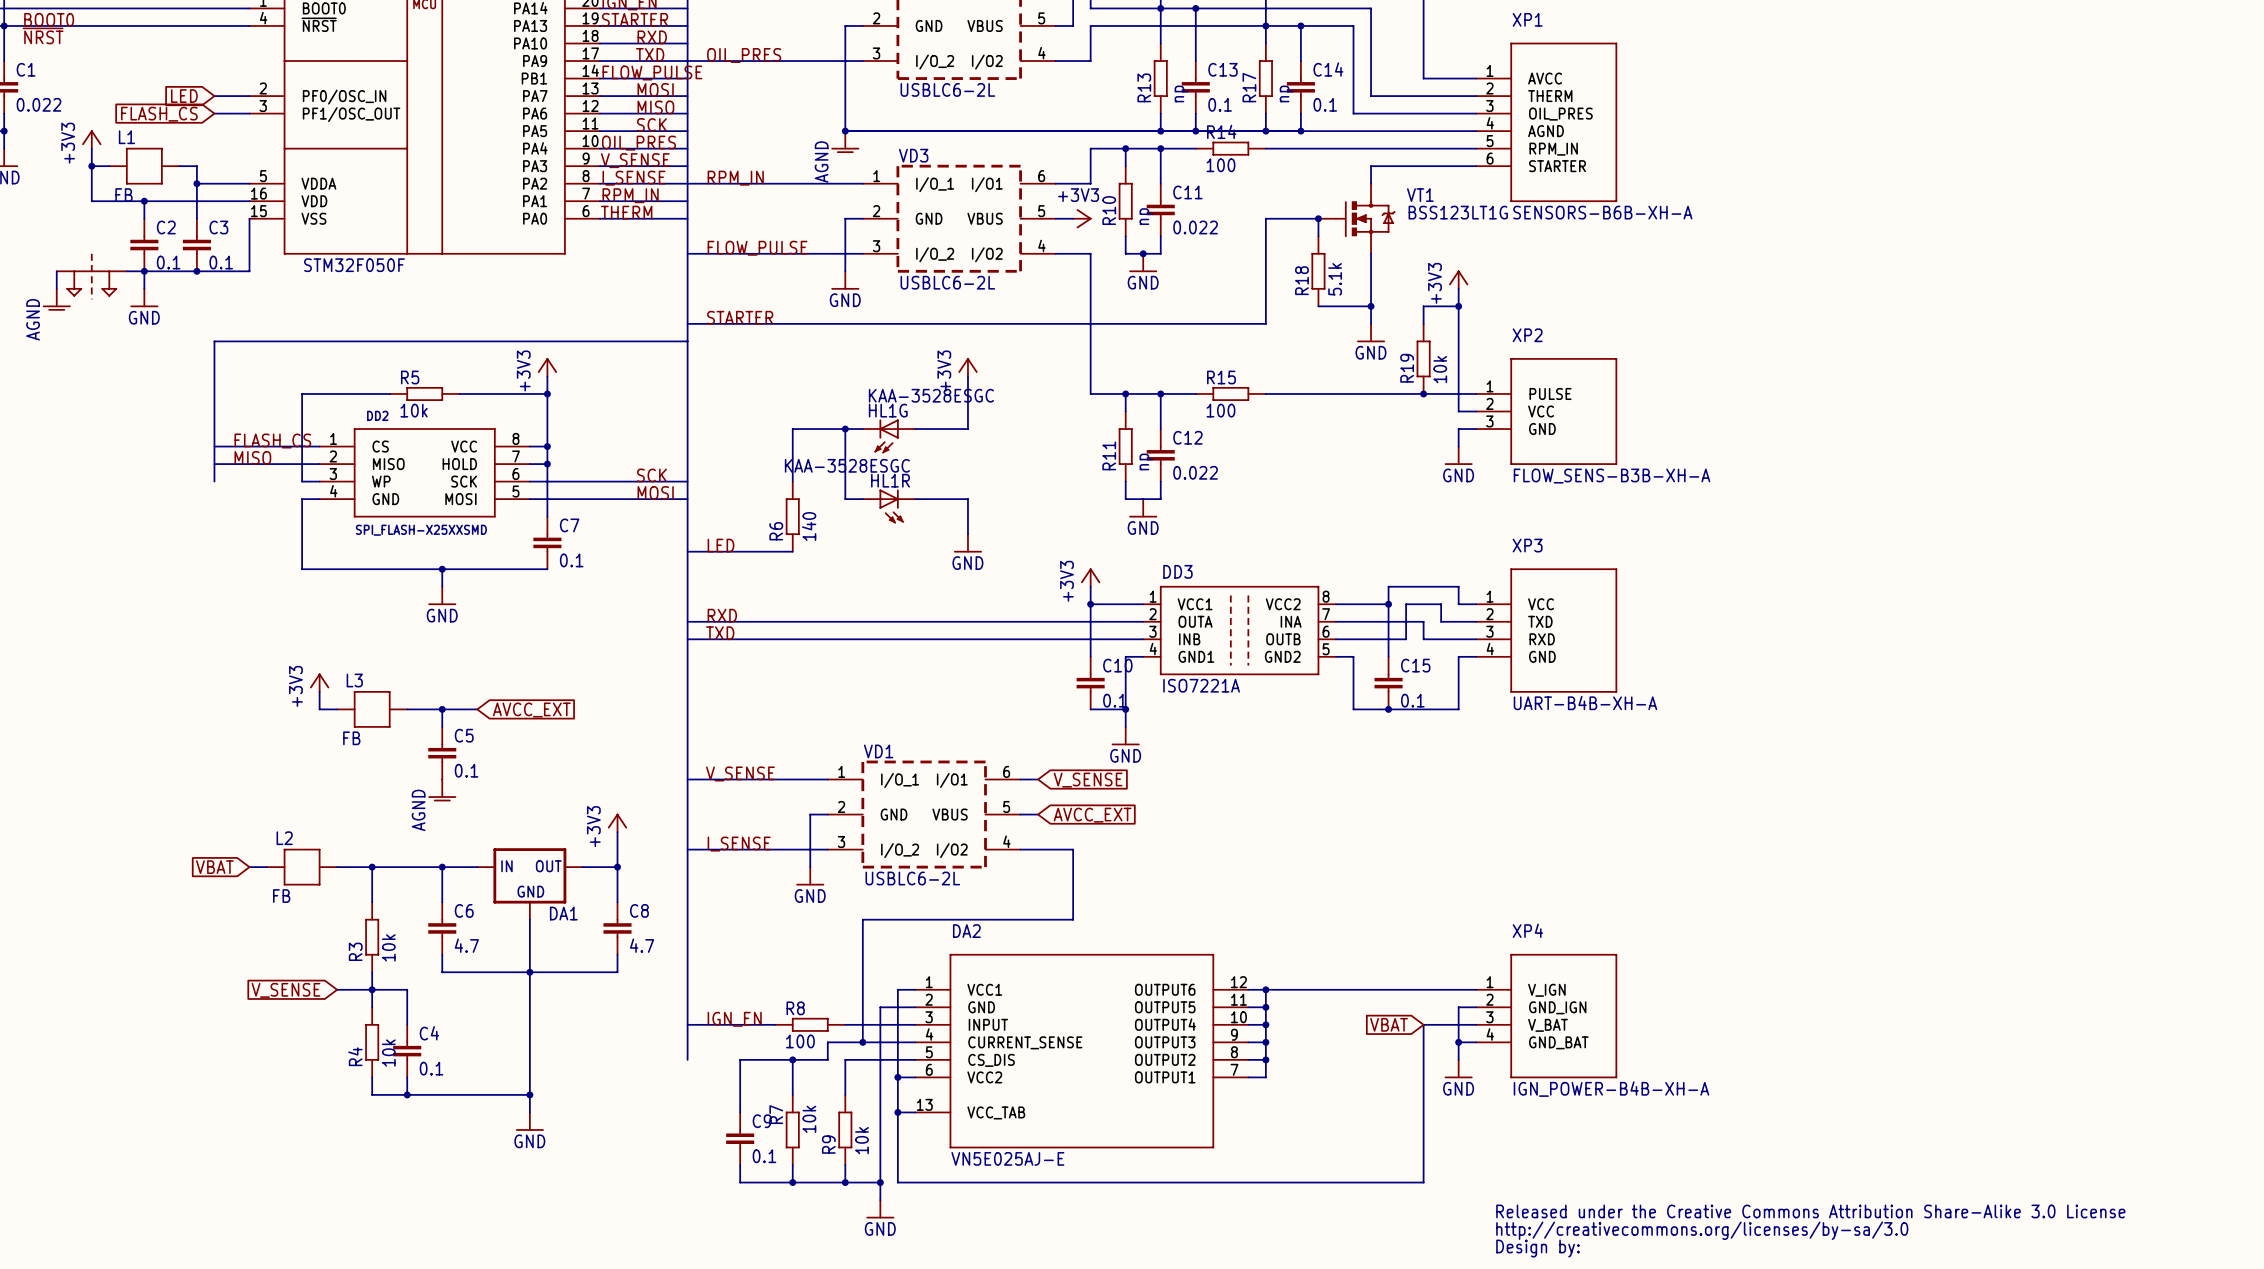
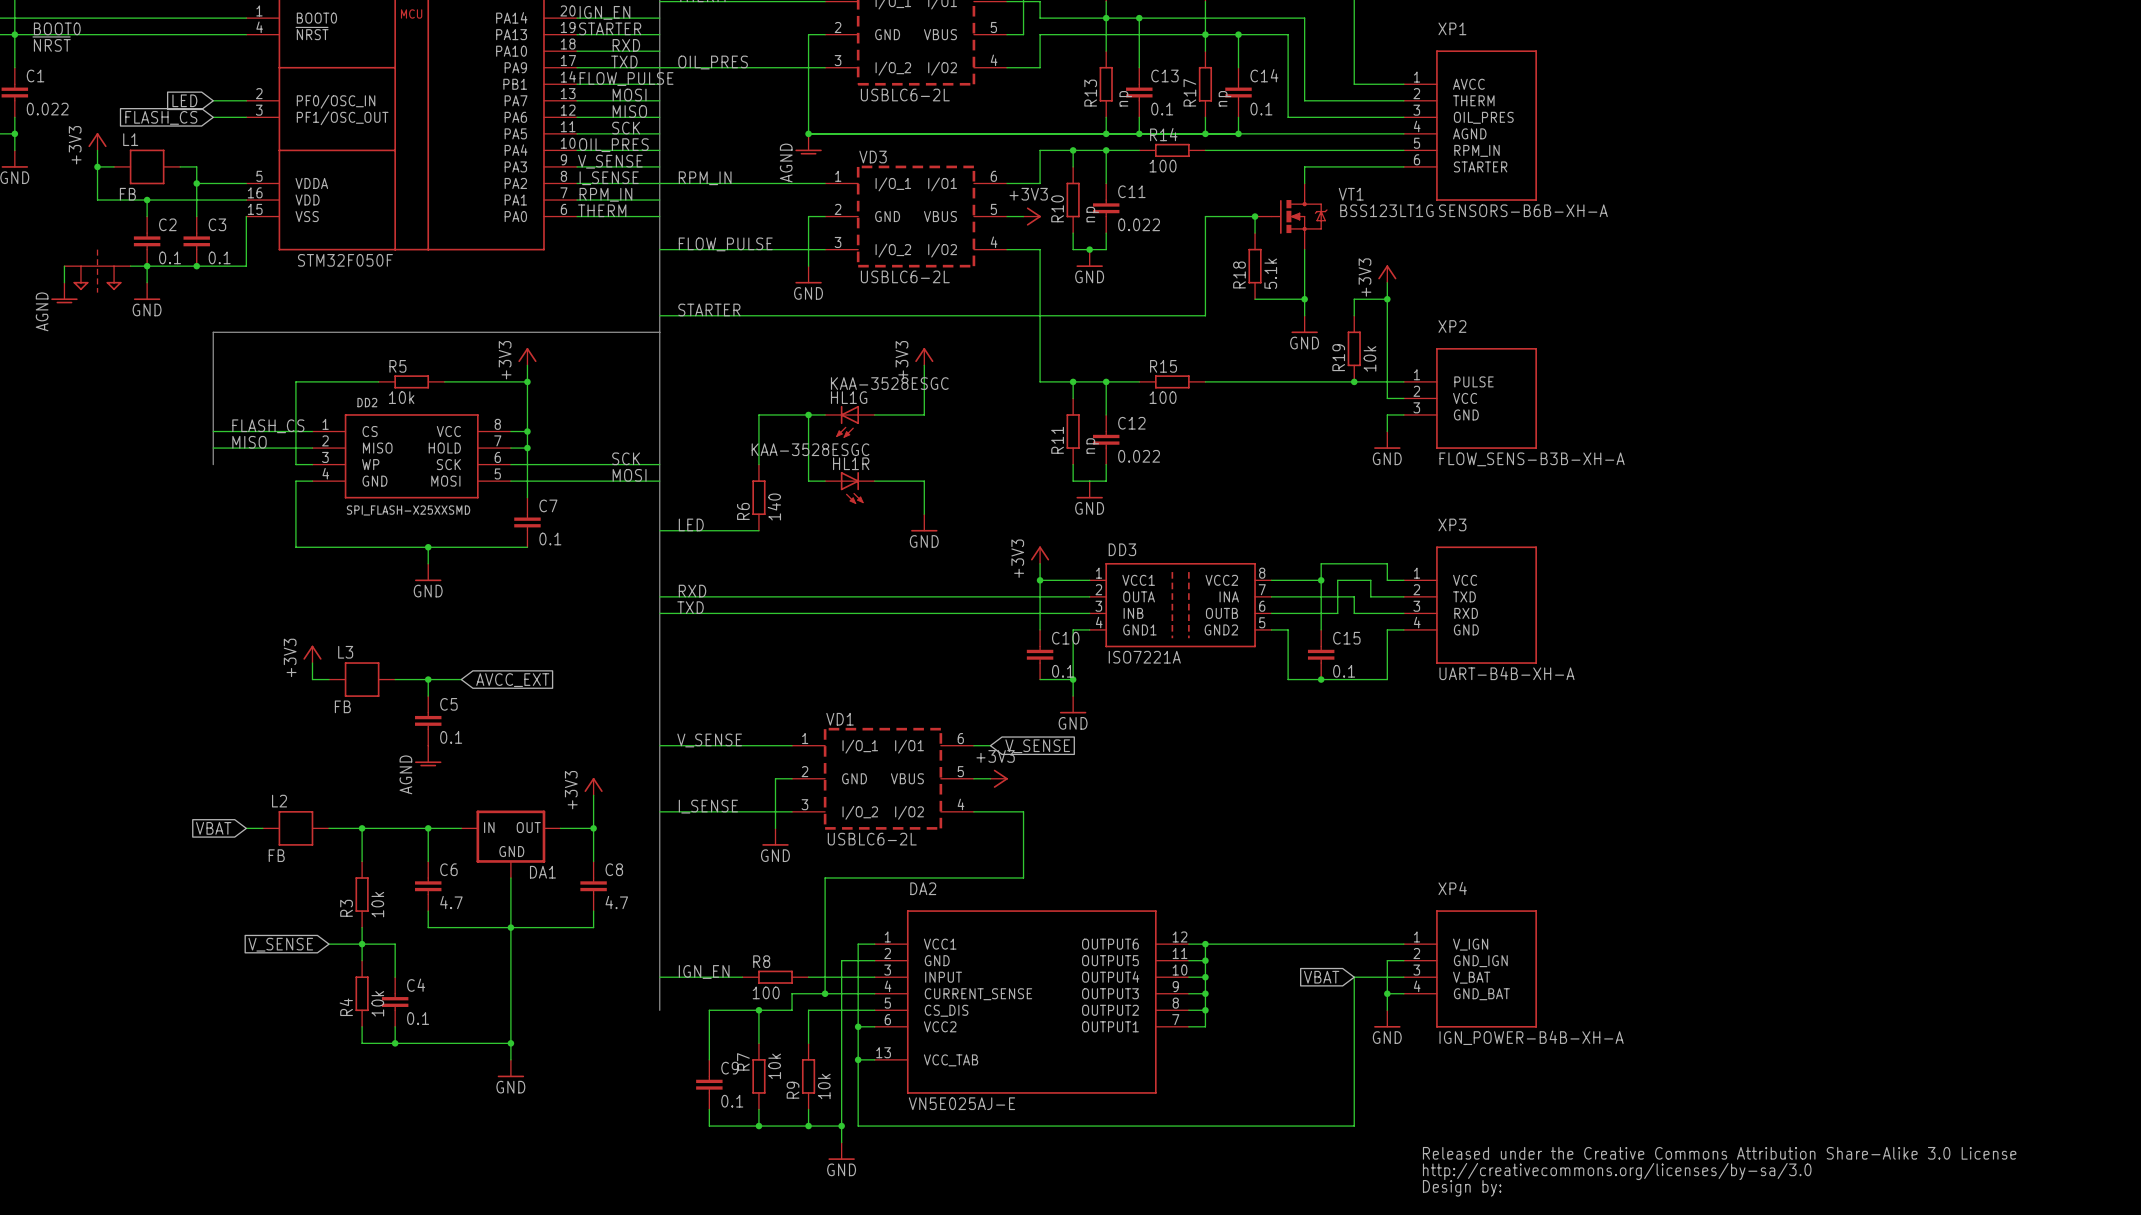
power symbol: none -> +3V3 (999, 778)
global label: AVCC_EXT (1092, 815) -> none

